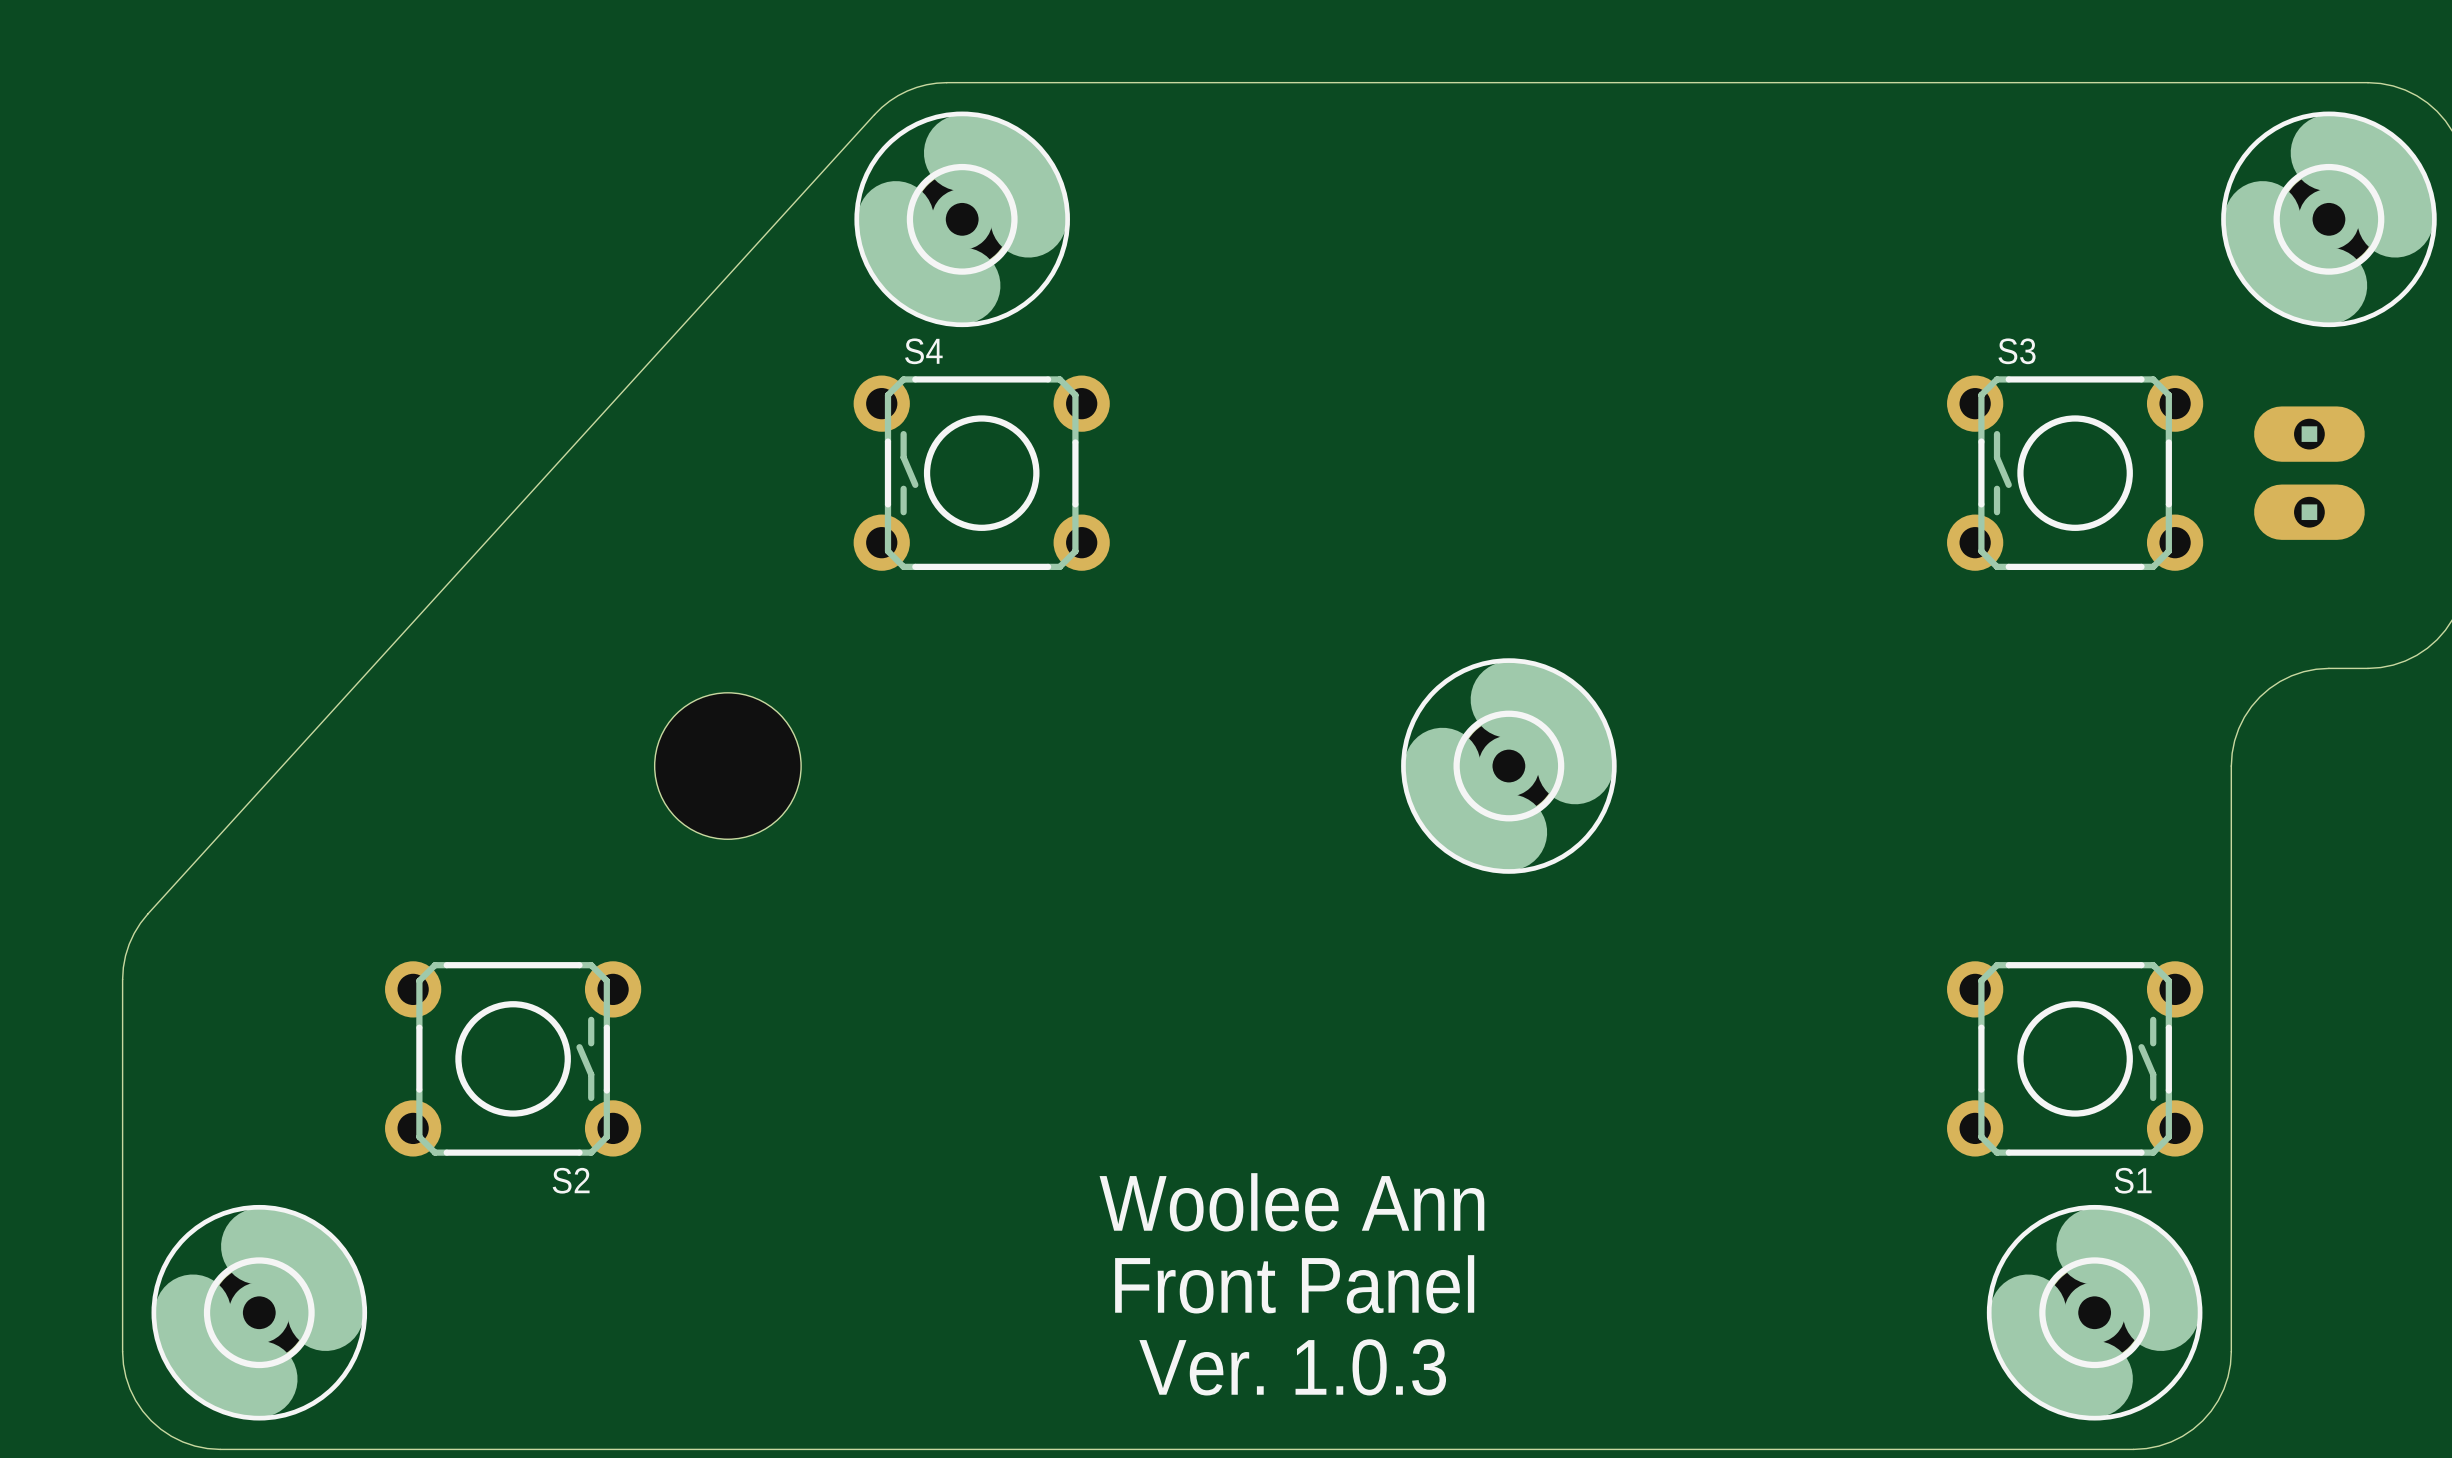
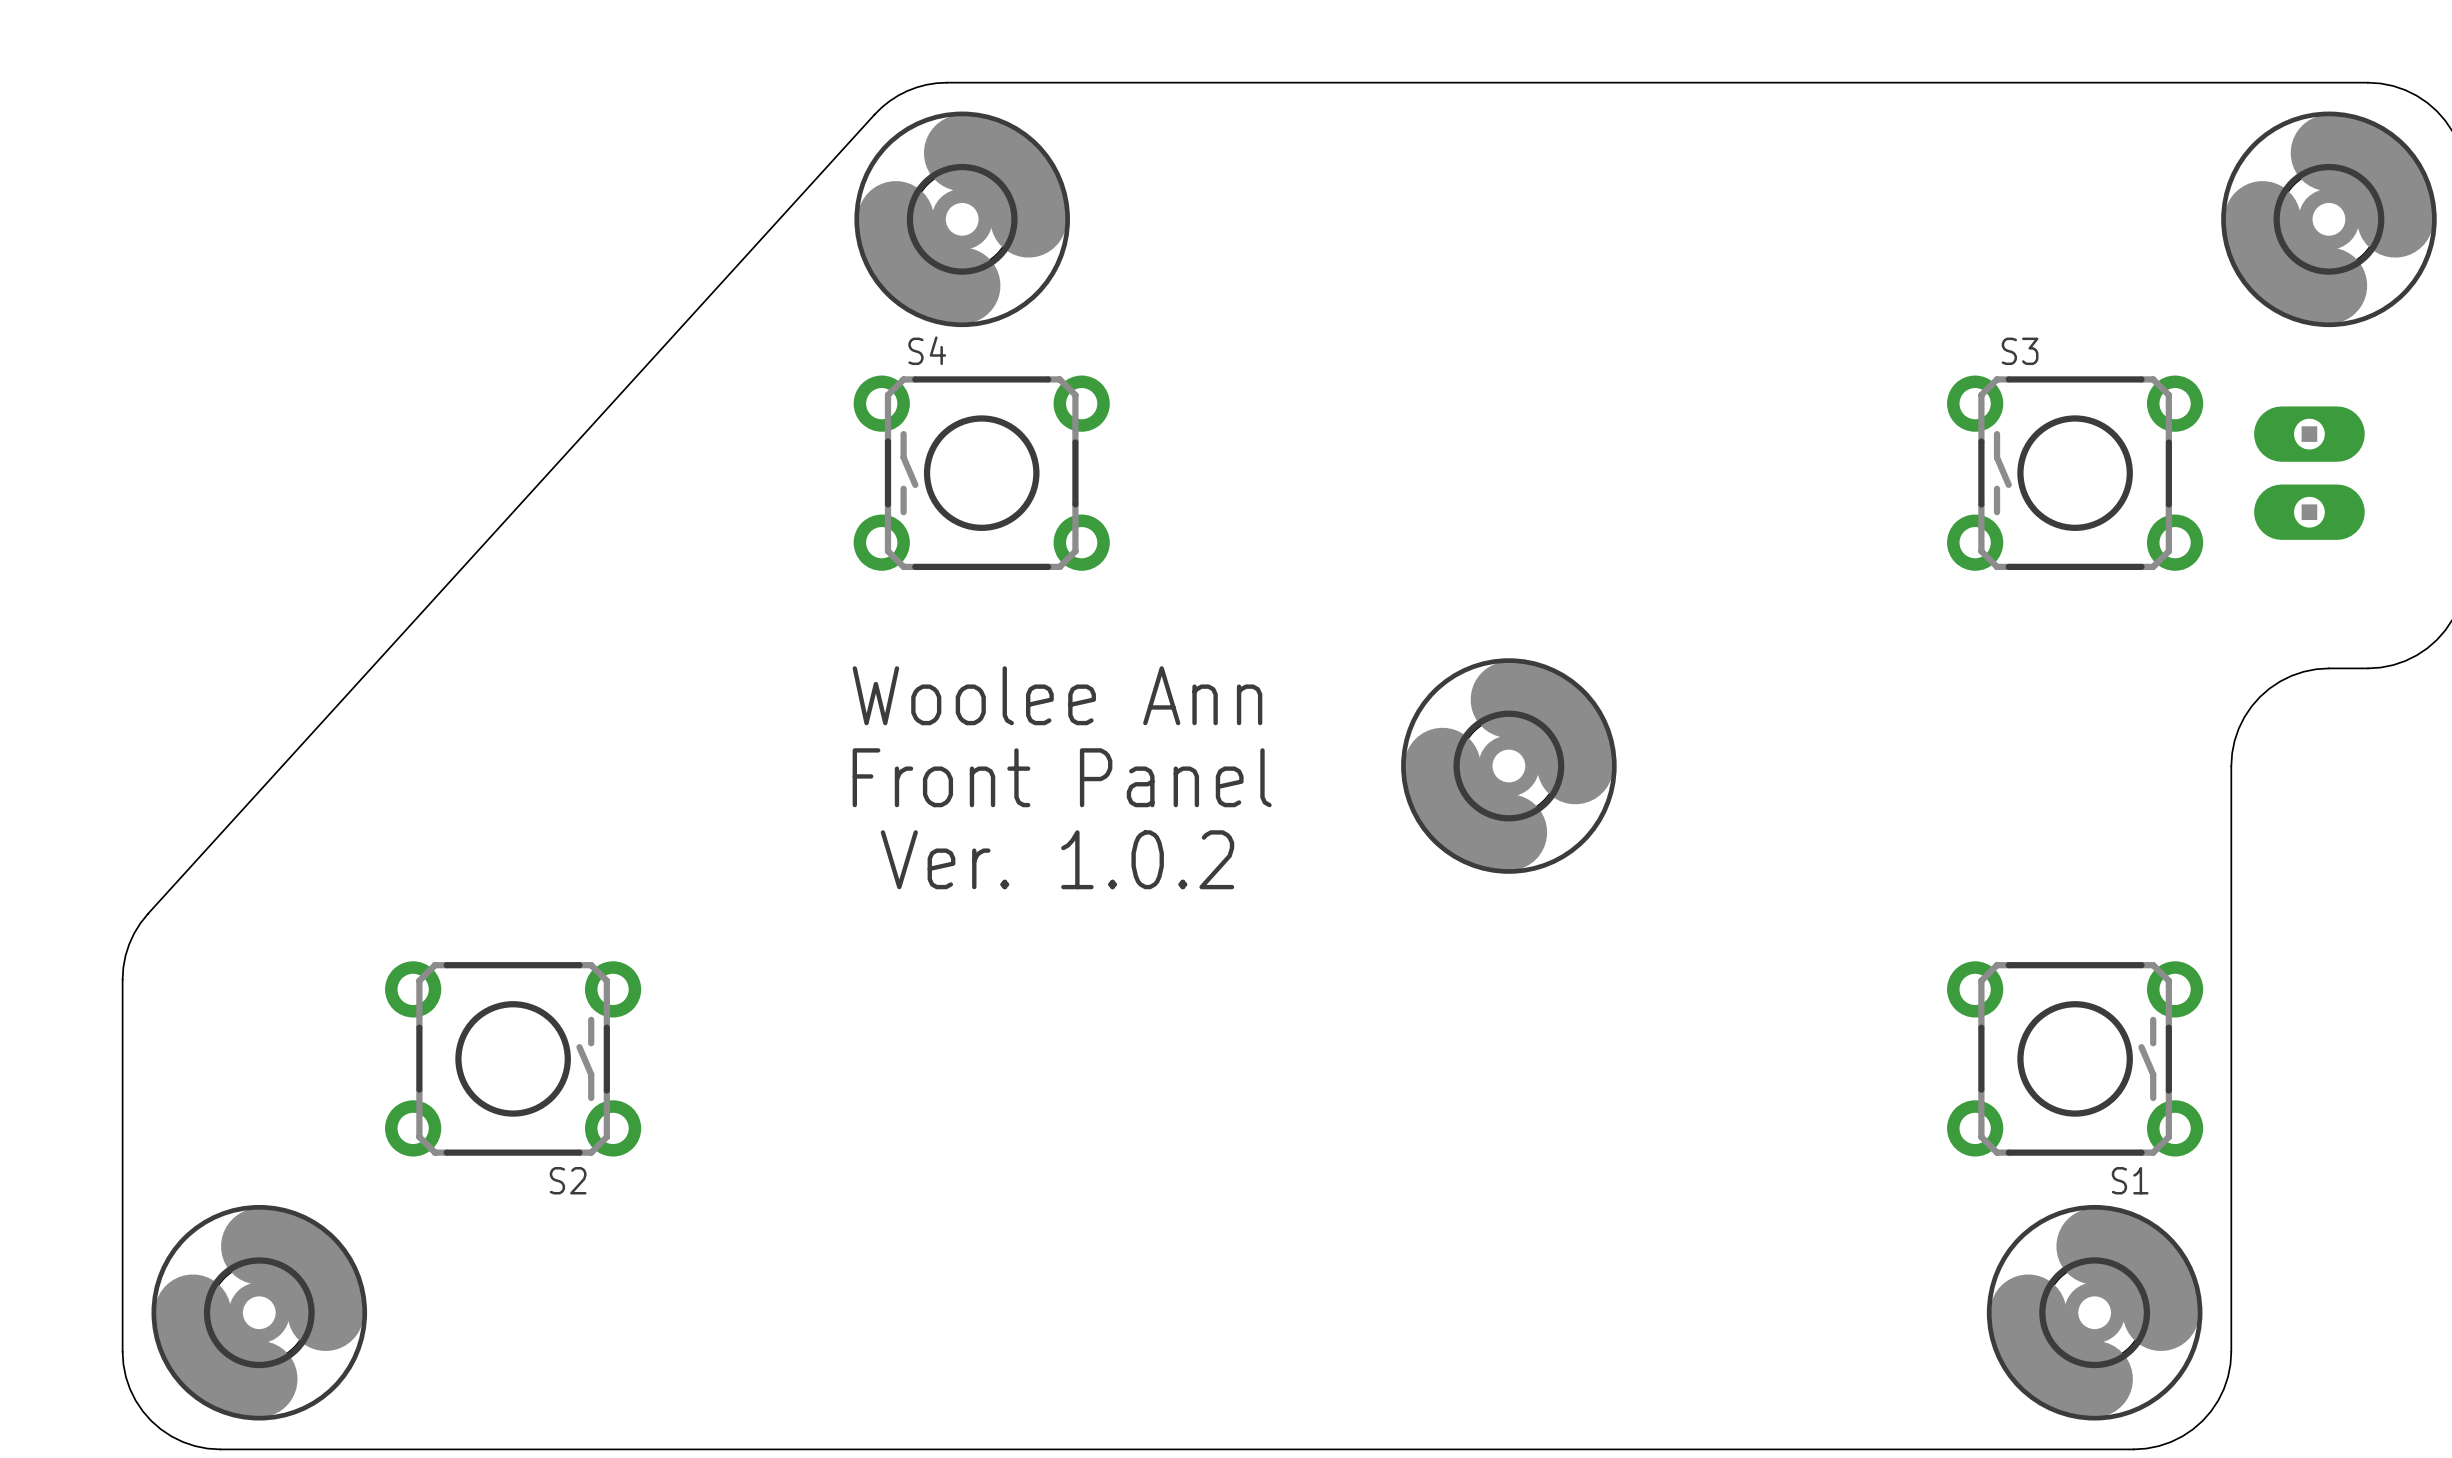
hole: (727, 766) -> none
text: none -> Ver. 1.0.2 (1057, 859)
text position: Woolee Ann (1291, 1202) -> Woolee Ann (1057, 695)
text position: Front Panel (1294, 1284) -> Front Panel (1062, 777)
text: Ver. 1.0.3 (1292, 1367) -> none

